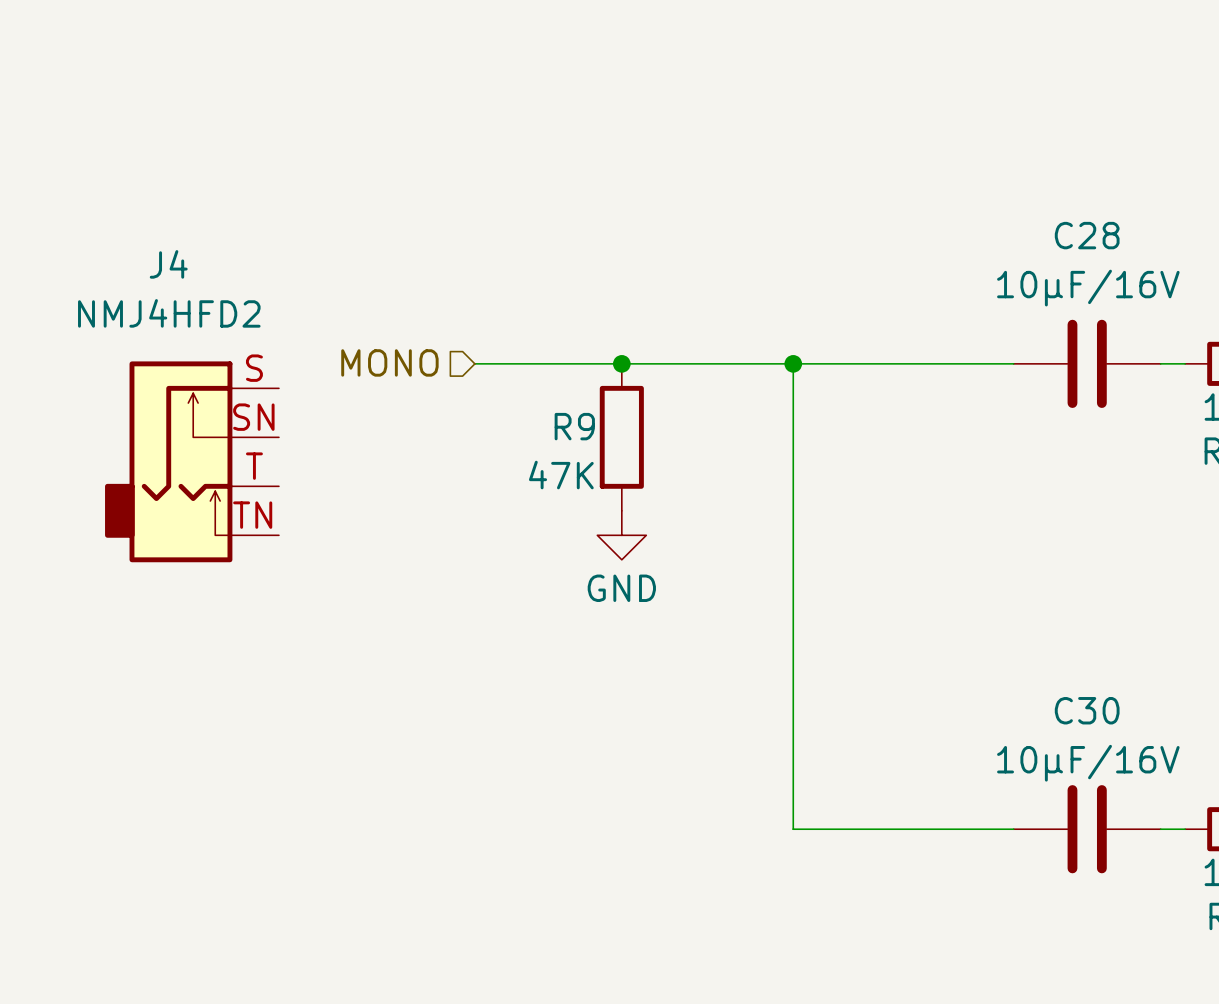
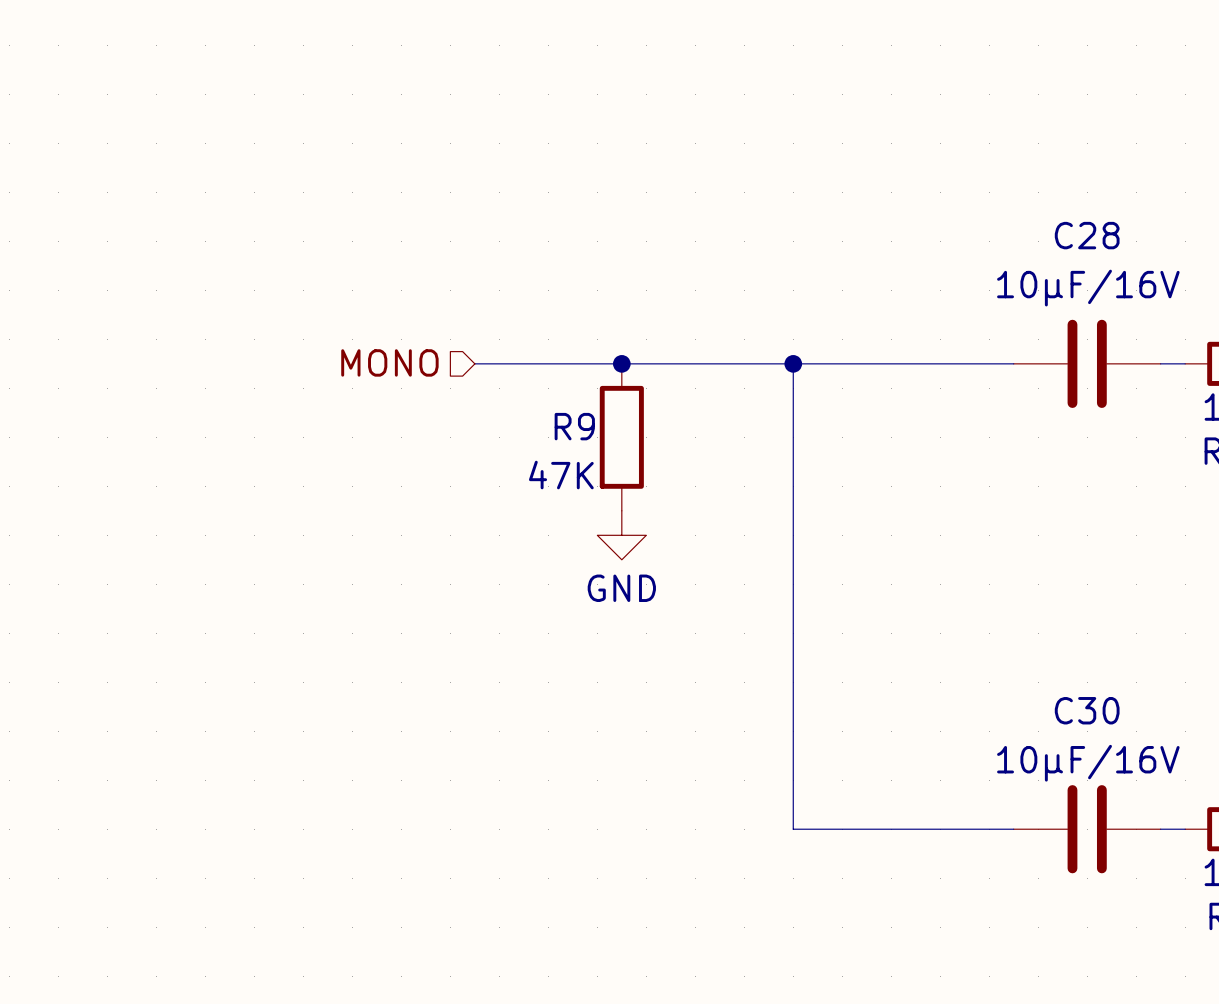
J4: NMJ4HFD2 (191, 461) -> none

